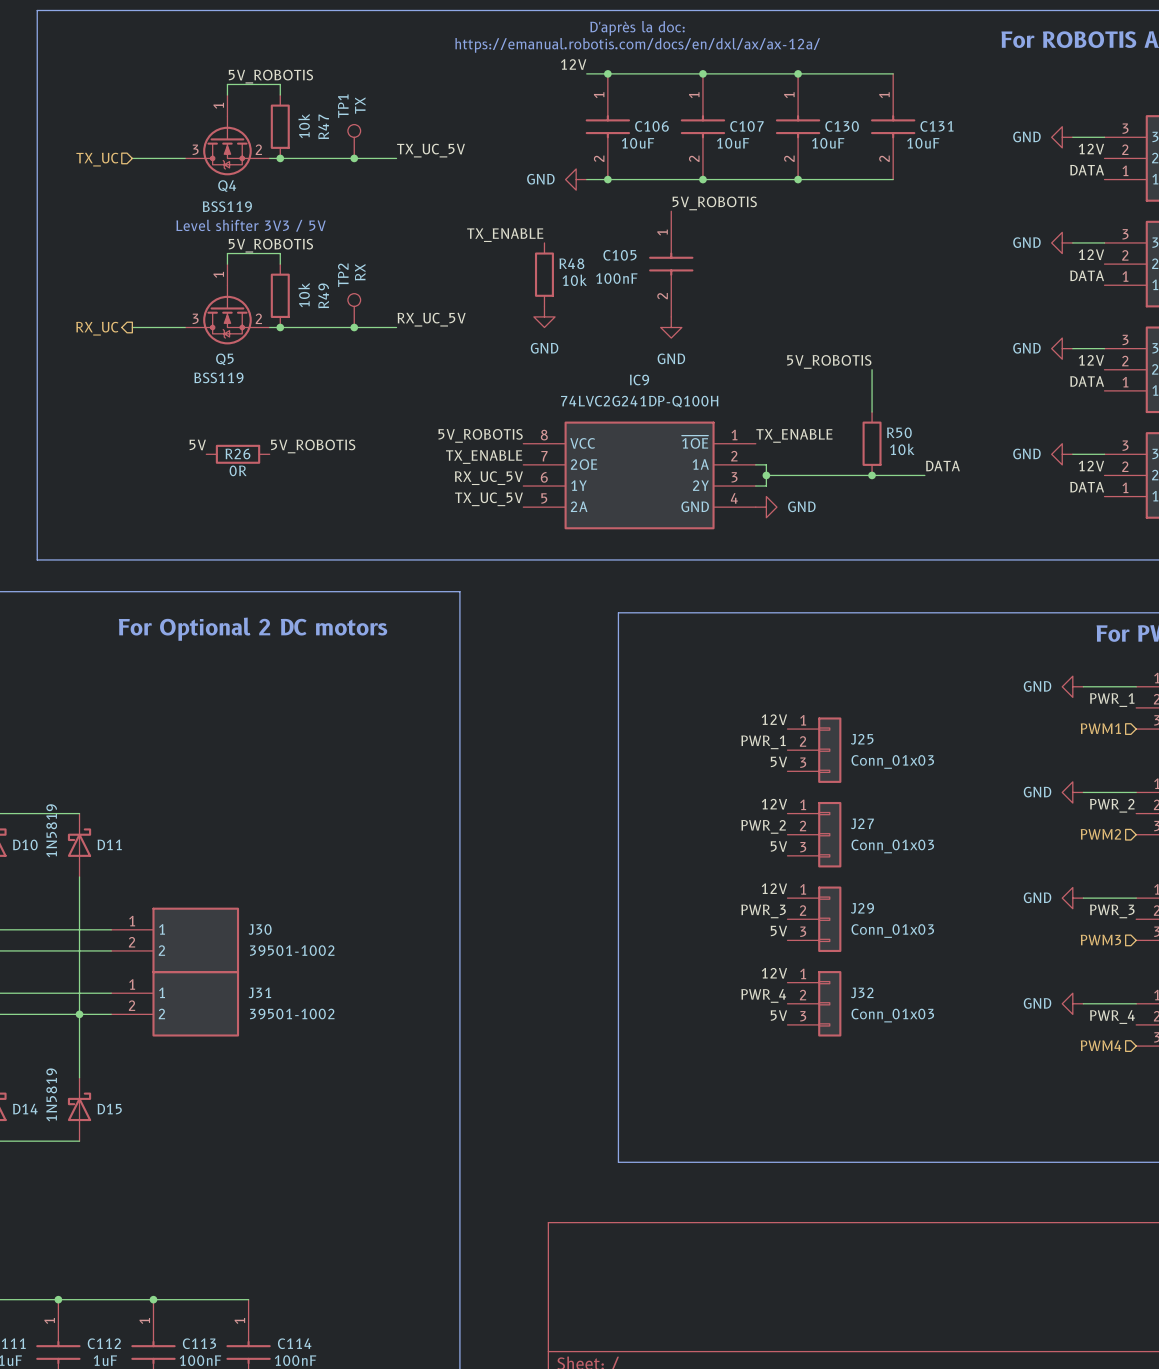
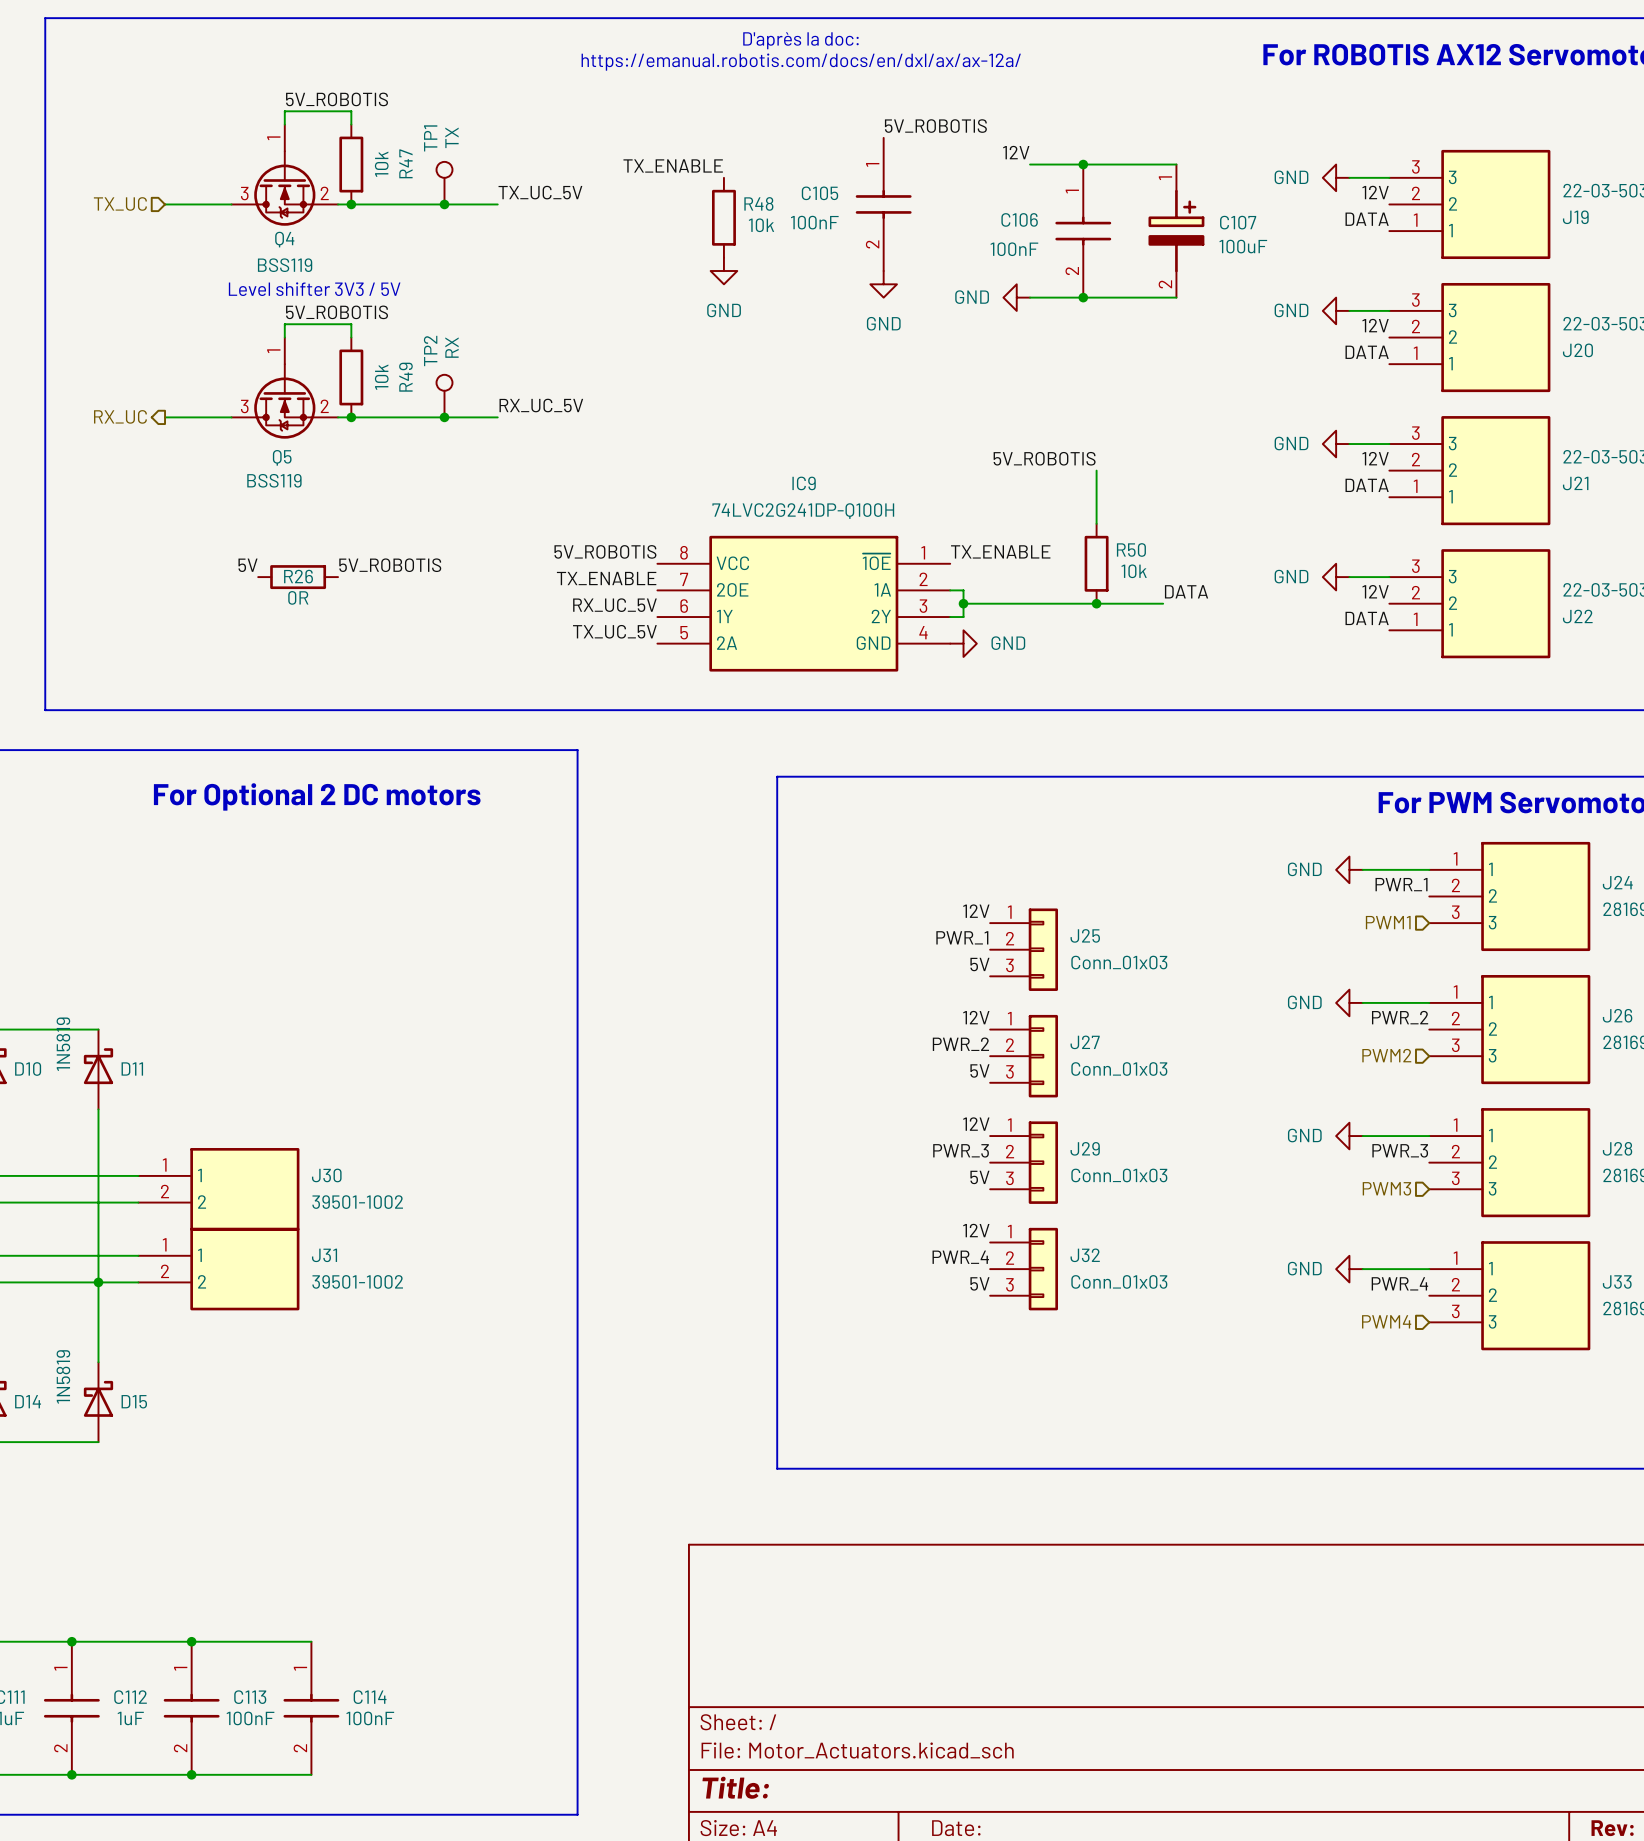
label: 12V (573, 64) -> none
wire: (586, 73) (893, 73) -> none
junction: (607, 73) -> none
C107 symbol: [680, 73, 726, 180] -> [1148, 164, 1205, 298]
junction: (702, 73) -> none
junction: (798, 73) -> none
label: none -> 12V (1016, 152)
C106 position: (607, 126) -> (1083, 231)
C106 name position: C106 (651, 126) -> C106 (1019, 219)
C130: 10uF (798, 126) -> none
wire: none -> (1030, 164) (1176, 164)
junction: none -> (1083, 164)
C131: 10uF (893, 126) -> none
C106 value: 10uF (637, 143) -> 100nF (1014, 249)
C107 value: 10uF (733, 143) -> 100uF (1243, 246)
power symbol rotation: 0° (576, 179) -> 90° counterclockwise (723, 271)
power symbol position: GND (576, 179) -> GND (723, 271)
wire: (586, 179) (893, 179) -> none
junction: (607, 179) -> none
junction: (702, 179) -> none
junction: (798, 179) -> none
label position: 5V_ROBOTIS (714, 203) -> 5V_ROBOTIS (935, 126)
power symbol: none -> GND (883, 284)
power symbol: none -> GND (1016, 297)
wire: none -> (1030, 297) (1176, 297)
junction: none -> (1083, 297)
label position: TX_ENABLE (505, 235) -> TX_ENABLE (673, 165)
C105 position: (671, 264) -> (883, 204)
R48 position: (544, 274) -> (723, 217)
power symbol: GND (544, 316) -> none
power symbol: GND (671, 327) -> none

